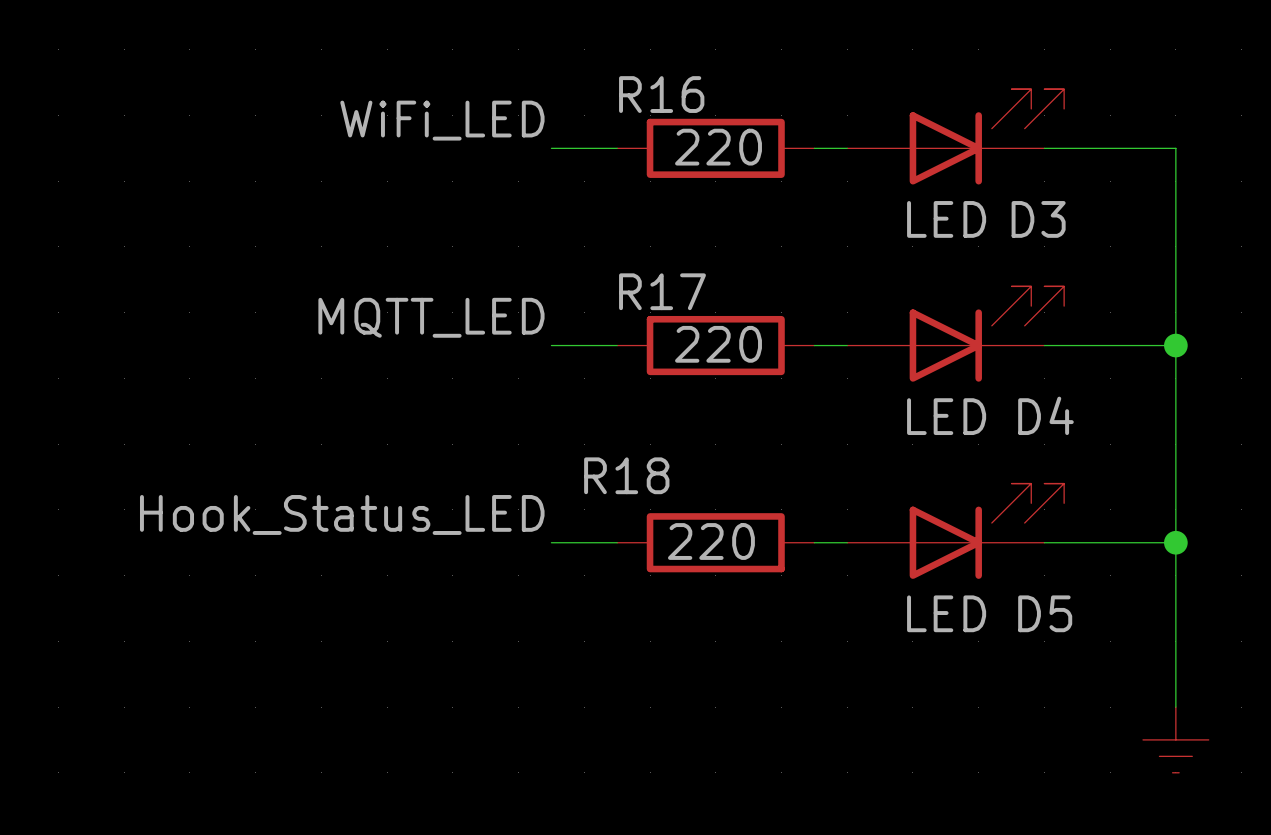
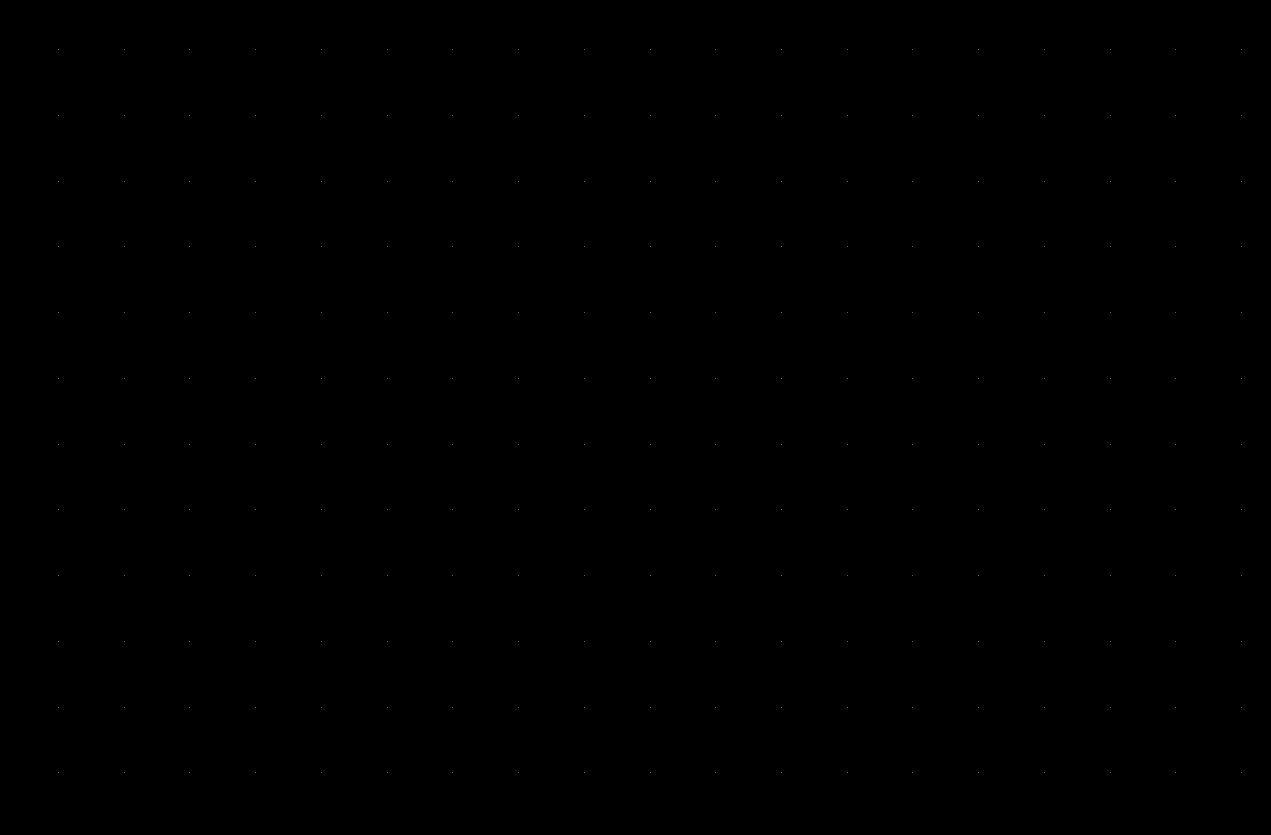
label: WiFi_LED (442, 120) -> none
D3: LED (955, 136) -> none
wire: (551, 148) (617, 148) -> none
R16: 220 (715, 148) -> none
wire: (814, 148) (847, 148) -> none
wire: (1044, 148) (1175, 148) (1175, 707) -> none
label: MQTT_LED (431, 317) -> none
D4: LED (955, 334) -> none
wire: (551, 345) (617, 345) -> none
R17: 220 (715, 345) -> none
wire: (814, 345) (847, 345) -> none
wire: (1044, 345) (1175, 345) -> none
junction: (1175, 345) -> none
label: Hook_Status_LED (342, 514) -> none
D5: LED (955, 531) -> none
wire: (551, 542) (617, 542) -> none
R18: 220 (715, 542) -> none
wire: (814, 542) (847, 542) -> none
wire: (1044, 542) (1175, 542) -> none
junction: (1175, 542) -> none
power symbol: (1175, 739) -> none

